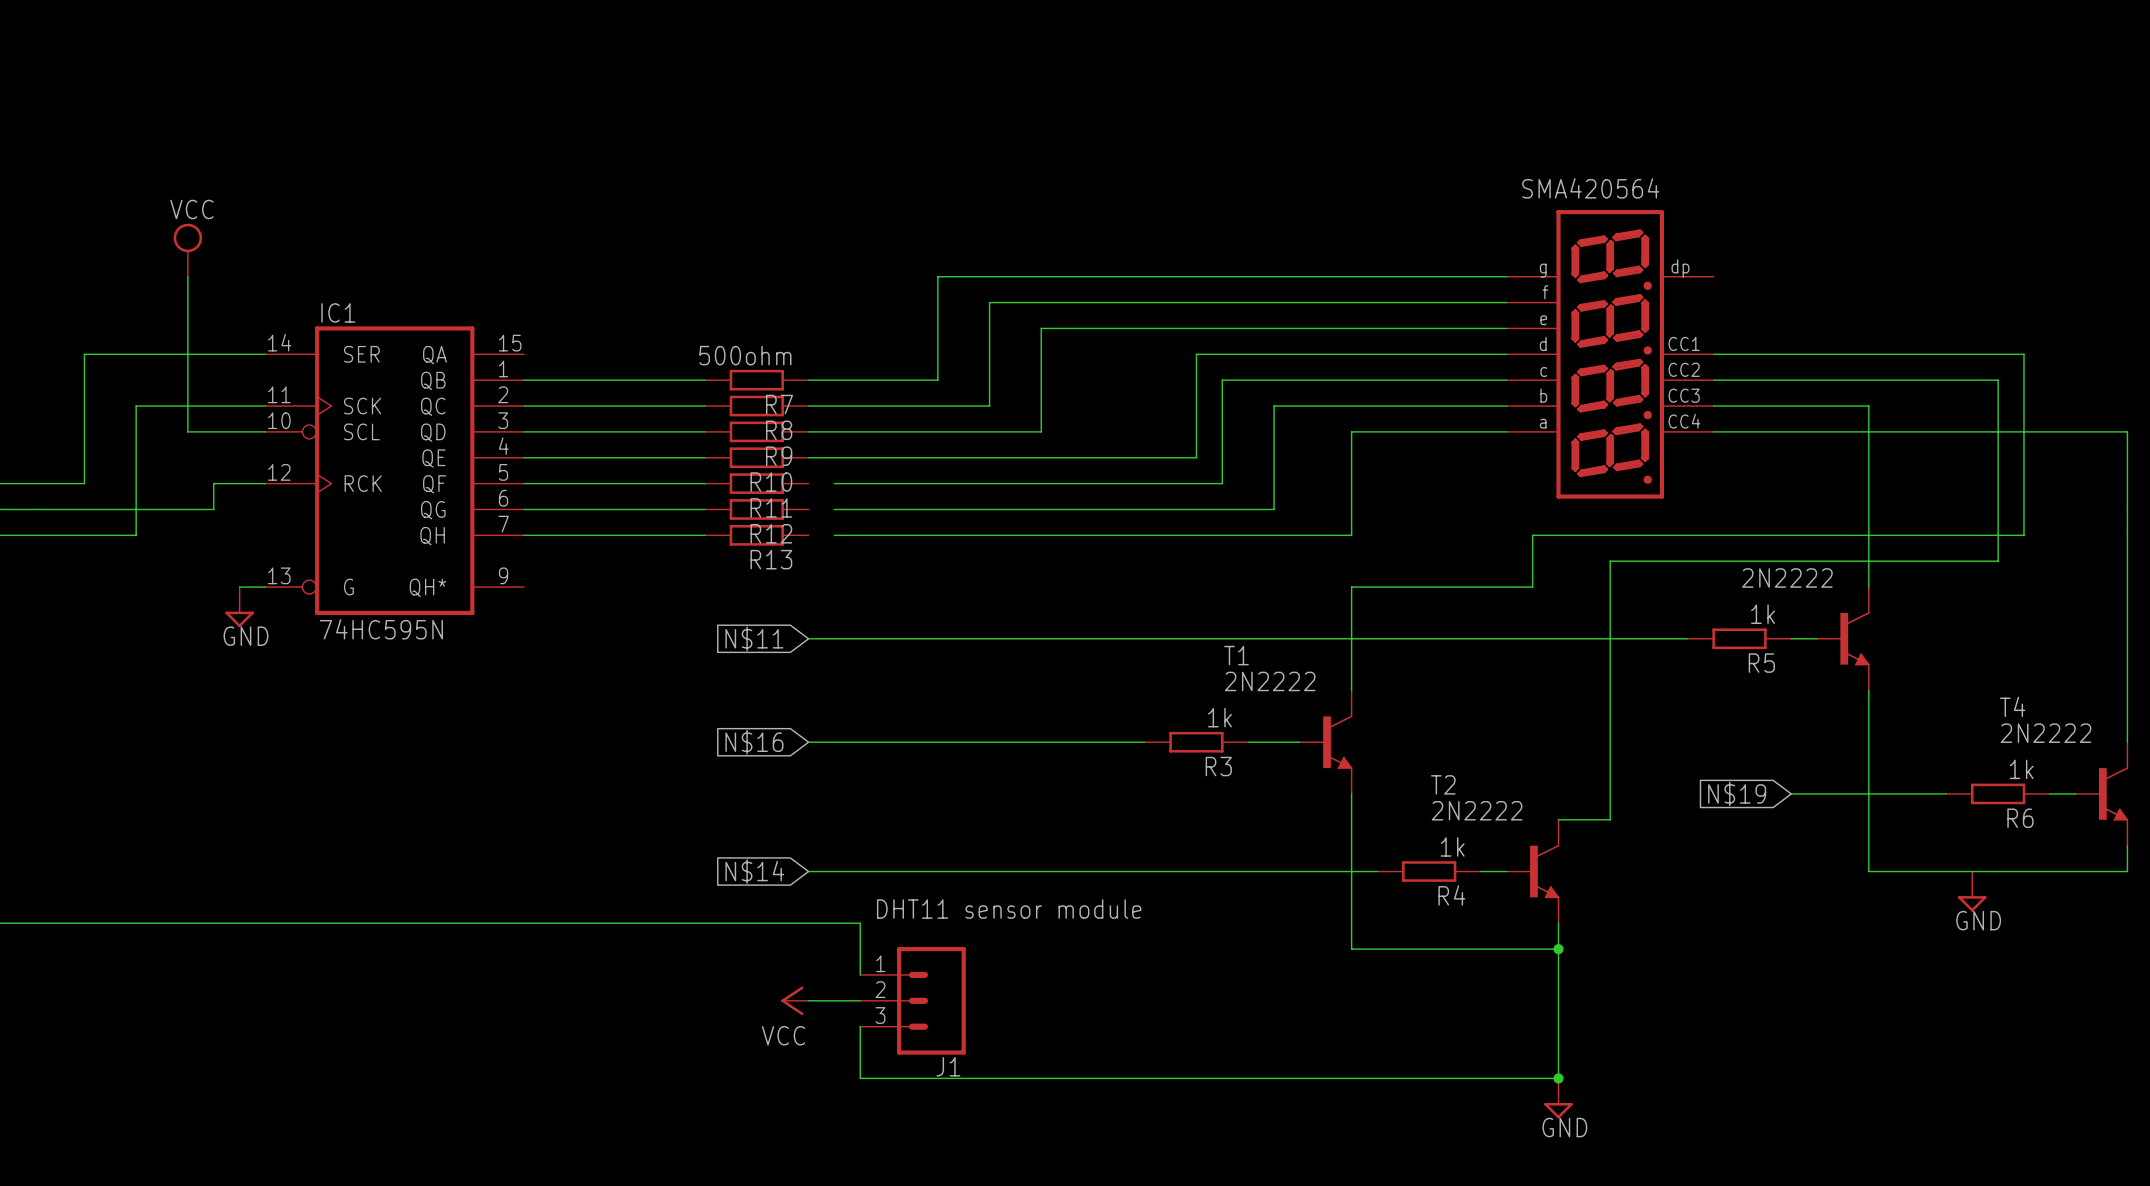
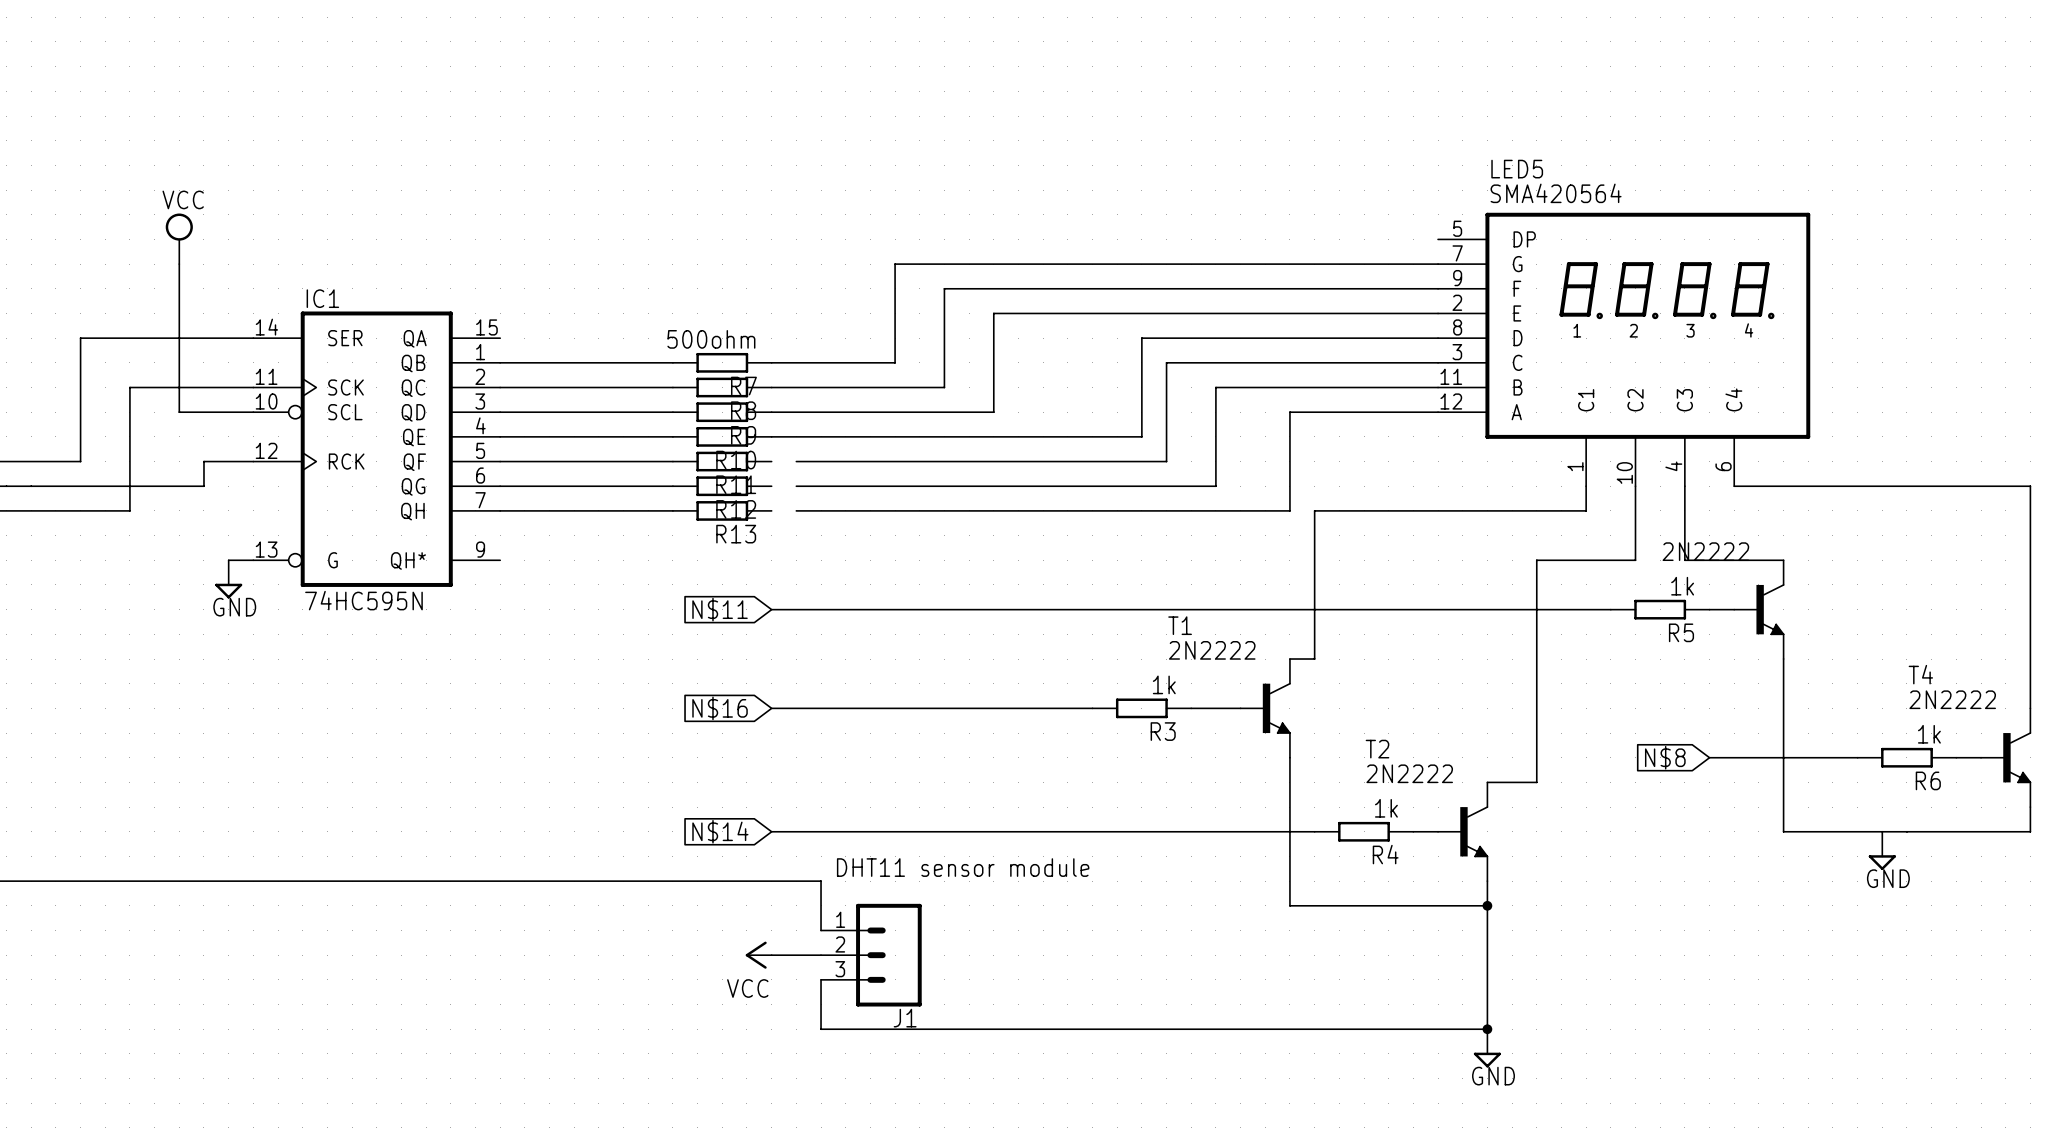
SMA420564: (1610, 354) -> none
wire: (1713, 354) (2023, 354) (2023, 535) (1661, 535) -> (1586, 486) (1586, 510)
LED5: none -> SMA420564 (1624, 349)
wire: (1713, 380) (1998, 380) (1998, 561) (1610, 561) (1610, 587) -> (1635, 486) (1635, 560) (1536, 560)
wire: (1713, 406) (1868, 406) (1868, 587) -> (1684, 486) (1684, 560) (1783, 560)
wire: (1713, 431) (2127, 431) (2127, 509) -> (1734, 486) (2030, 486)
wire: (1532, 535) (1532, 587) (1351, 587) (1351, 690) -> (1462, 510) (1314, 510) (1314, 659) (1289, 659)
global label: N$19 (1737, 793) -> N$8 (1665, 757)

